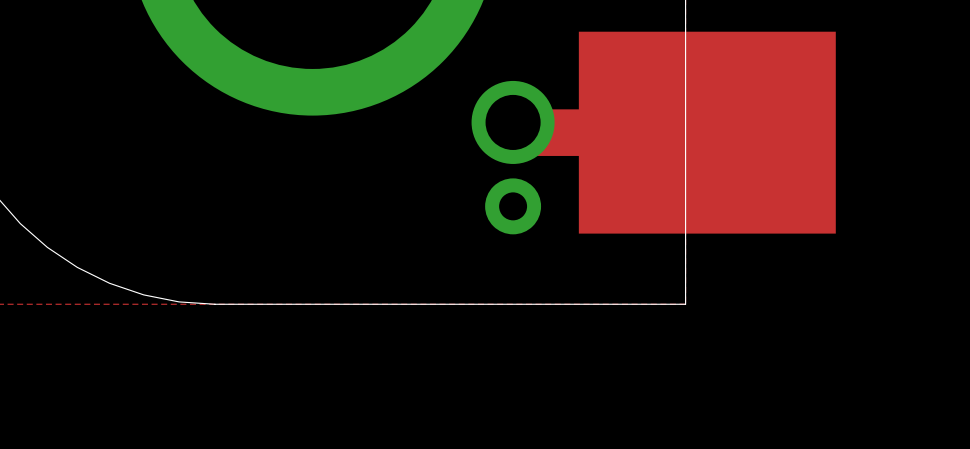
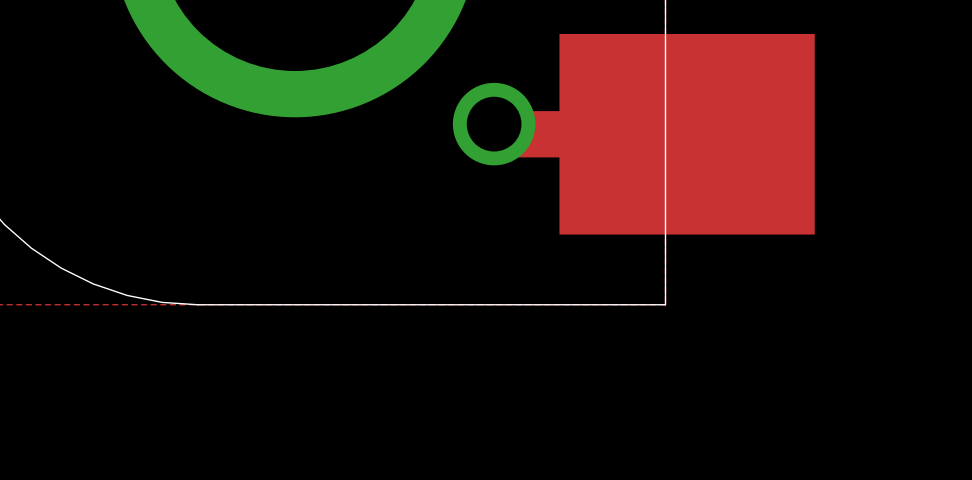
via: (513, 206) -> none

